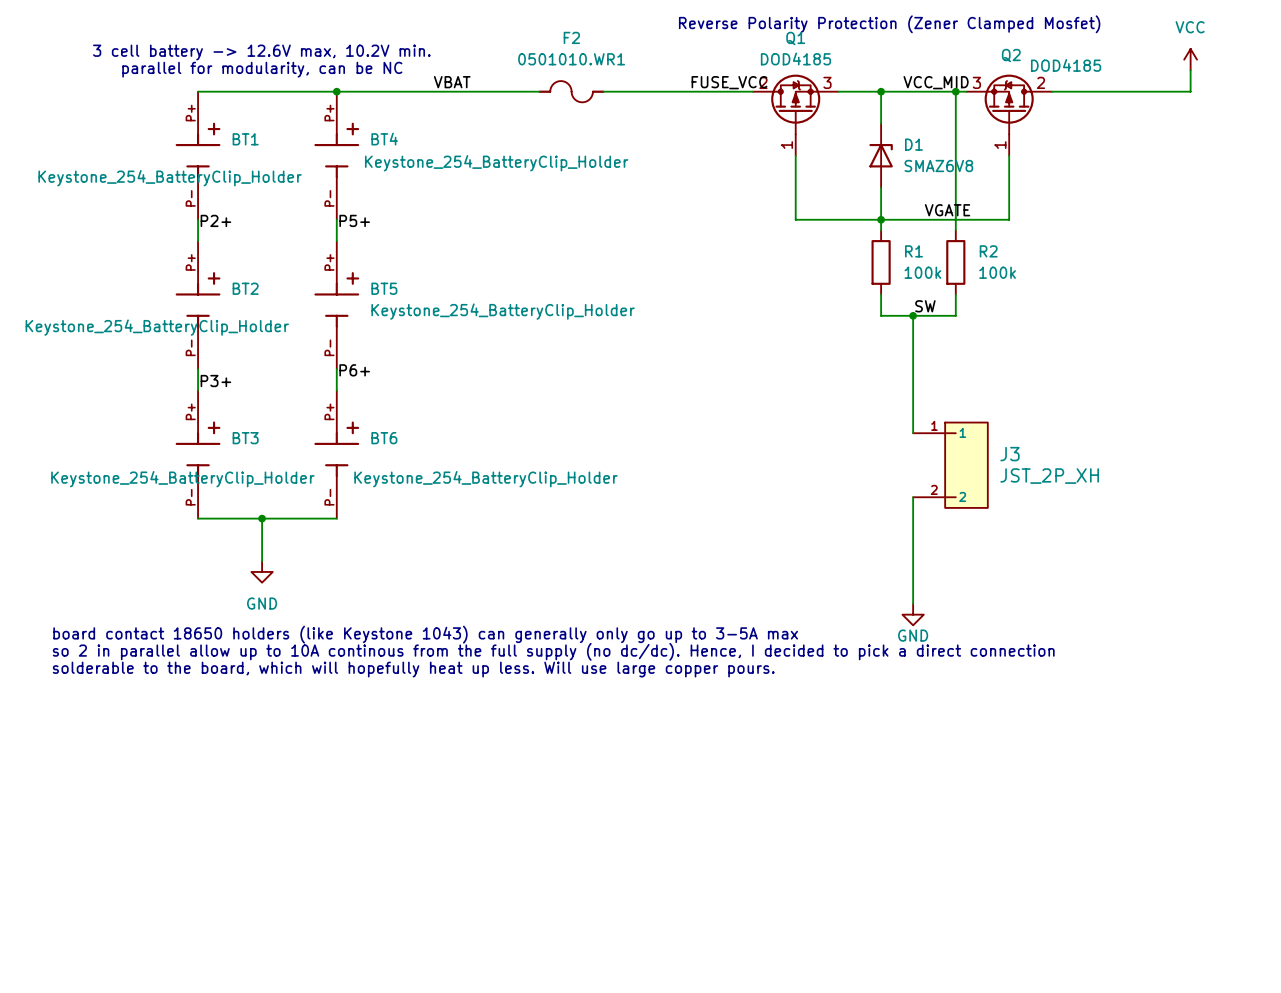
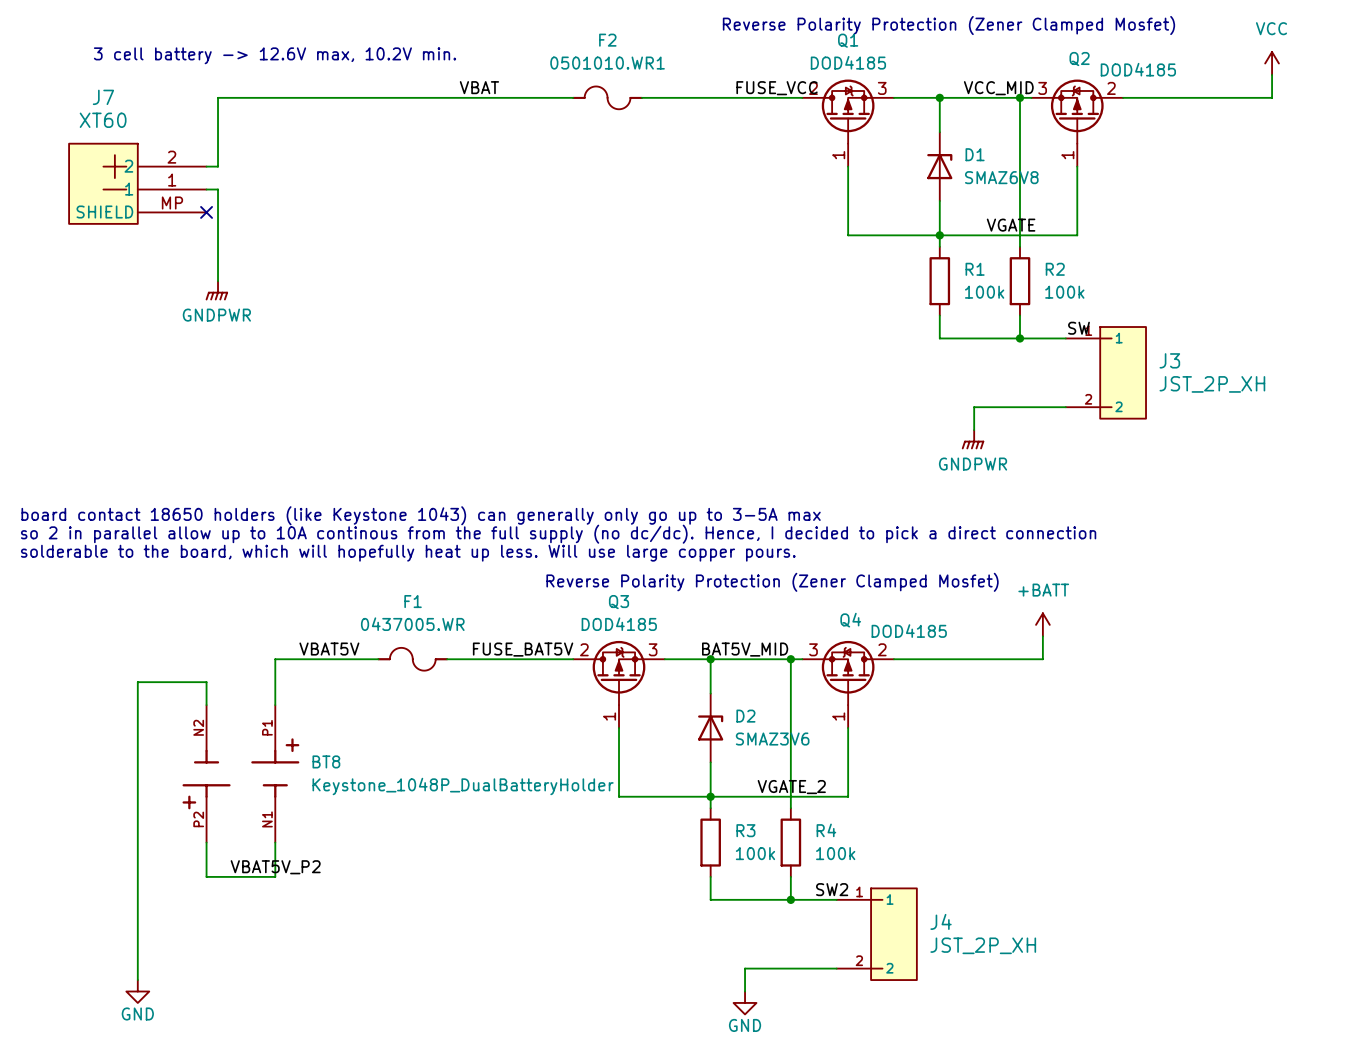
text: parallel for modularity, can be NC (262, 69) -> none
wire: (198, 91) (208, 91) -> (206, 166) (218, 166) (218, 97)
junction: (336, 91) -> none
BT1: Keystone_254_BatteryClip_Holder (198, 155) -> none
BT4: Keystone_254_BatteryClip_Holder (336, 155) -> none
J7: none -> XT60 (137, 183)
wire: none -> (206, 189) (218, 189) (218, 281)
no-connect mark: none -> (206, 212)
wire: (198, 219) (198, 241) -> none
wire: (336, 219) (336, 241) -> none
label: P2+ (215, 220) -> none
label: P5+ (354, 220) -> none
power symbol: none -> GNDPWR (216, 290)
BT2: Keystone_254_BatteryClip_Holder (198, 305) -> none
BT5: Keystone_254_BatteryClip_Holder (336, 305) -> none
label position: SW (925, 306) -> SW (1079, 328)
wire: (913, 315) (913, 379) -> (1065, 407) (974, 407)
junction position: (913, 315) -> (1019, 338)
wire: none -> (1019, 338) (1065, 338)
wire: (198, 369) (198, 390) -> none
wire: (336, 369) (336, 390) -> none
label: P6+ (354, 370) -> none
label: P3+ (215, 381) -> none
wire: (913, 401) (913, 433) -> none
power symbol: none -> GNDPWR (973, 439)
BT3: Keystone_254_BatteryClip_Holder (198, 454) -> none
BT6: Keystone_254_BatteryClip_Holder (336, 454) -> none
J3 position: (950, 465) -> (1105, 372)
wire: (913, 497) (913, 603) -> none
wire: (198, 518) (336, 518) -> none
wire: (262, 518) (262, 561) -> none
junction: (262, 518) -> none
text: none -> Reverse Polarity Protection (Zener Clamped Mosfet) (772, 582)
power symbol: GND (262, 571) -> none
power symbol: none -> +BATT (1042, 624)
wire: none -> (1042, 636) (1042, 659) (893, 659)
label: none -> VBAT5V (329, 649)
label: none -> FUSE_BAT5V (523, 649)
label: none -> BAT5V_MID (745, 649)
wire: none -> (378, 659) (275, 659) (275, 705)
F1: none -> 0437005.WR (412, 659)
wire: none -> (447, 659) (573, 659)
wire: none -> (664, 659) (802, 659)
wire: none -> (710, 659) (710, 693)
junction: none -> (710, 659)
wire: none -> (790, 659) (790, 808)
junction: none -> (790, 659)
power symbol: GND (913, 614) -> none
text position: board contact 18650 holders (like Keystone 1043) can generally only go up to 3-5A max (425, 634) -> board contact 18650 holders (like Keystone 1043) can generally only go up to 3-5A max (421, 515)
Q3: none -> DOD4185 (619, 684)
Q4: none -> DOD4185 (848, 684)
text position: so 2 in parallel allow up to 10A continous from the full supply (no dc/dc). Hence, I decided to pick a direct connection (553, 651) -> so 2 in parallel allow up to 10A continous from the full supply (no dc/dc). Hence, I decided to pick a direct connection (558, 534)
wire: none -> (206, 705) (206, 682) (137, 682) (137, 980)
text position: solderable to the board, which will hopefully heat up less. Will use large copper pours. (413, 669) -> solderable to the board, which will hopefully heat up less. Will use large copper pours. (408, 553)
wire: none -> (619, 727) (619, 796) (848, 796) (848, 727)
D2: none -> SMAZ3V6 (710, 727)
wire: none -> (710, 762) (710, 808)
BT8: none -> Keystone_1048P_DualBatteryHolder (240, 773)
label: none -> VGATE_2 (791, 787)
junction: none -> (710, 796)
wire: none -> (206, 842) (206, 876) (275, 876) (275, 842)
R3: none -> 100k (710, 842)
R4: none -> 100k (790, 842)
label: none -> VBAT5V_P2 (275, 867)
wire: none -> (710, 876) (710, 899) (836, 899)
wire: none -> (790, 876) (790, 899)
label: none -> SW2 (832, 889)
junction: none -> (790, 899)
J4: none -> JST_2P_XH (876, 934)
wire: none -> (836, 968) (745, 968) (745, 991)
power symbol: none -> GND (137, 991)
power symbol: none -> GND (745, 1002)

